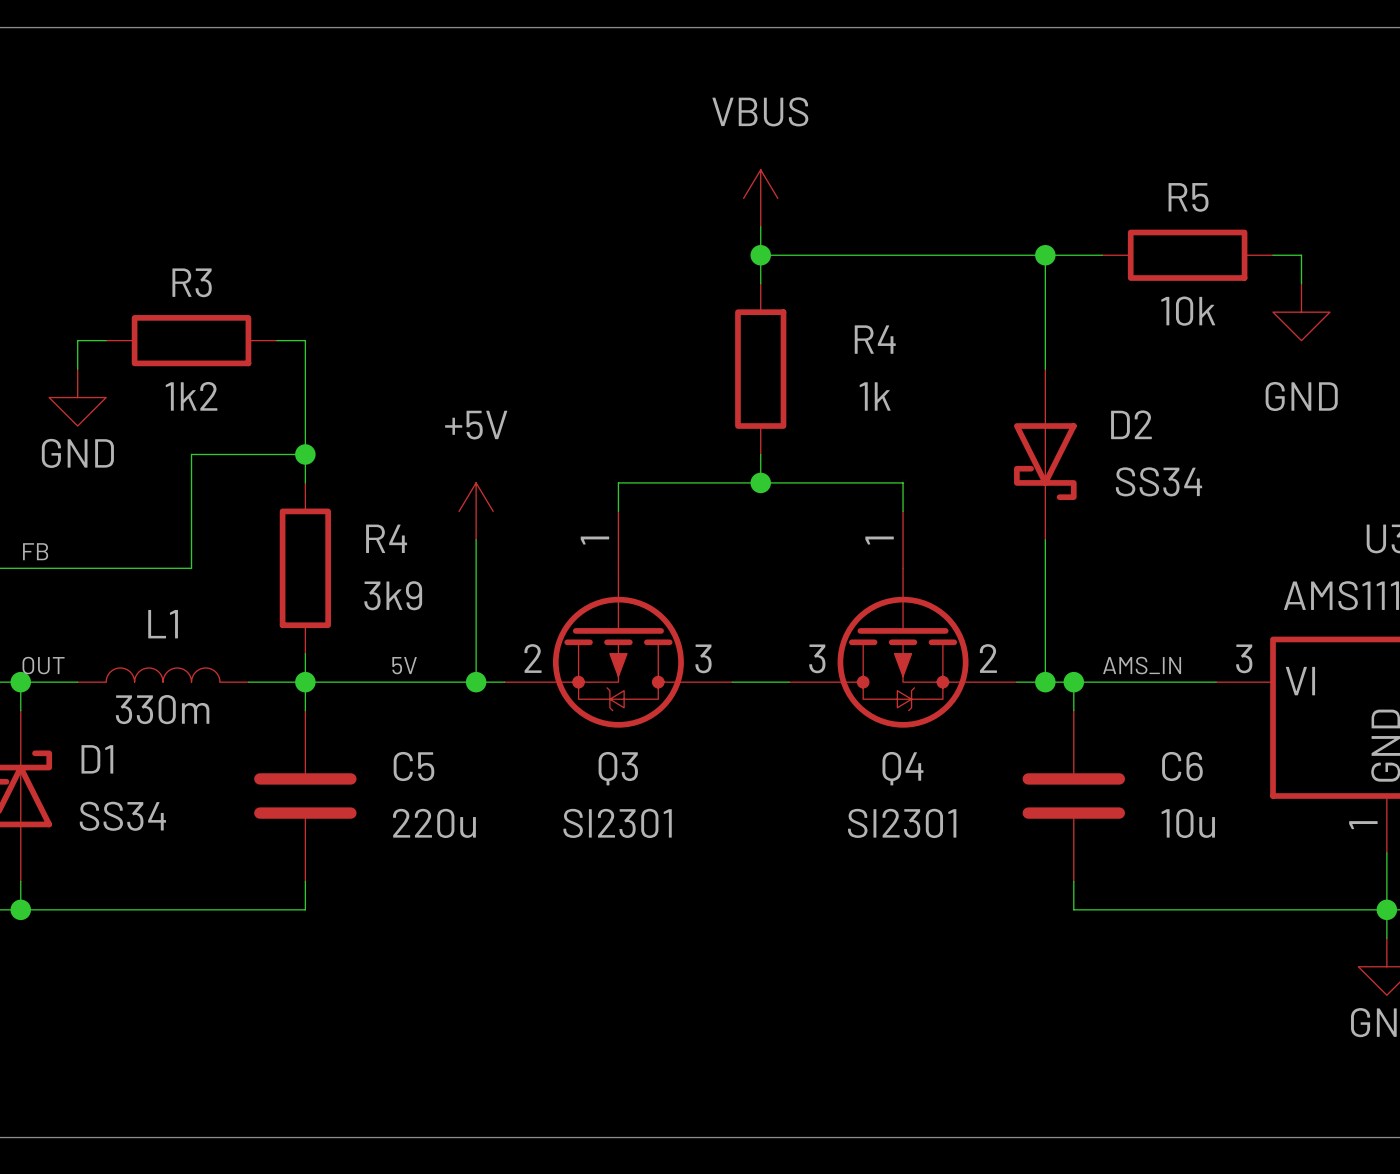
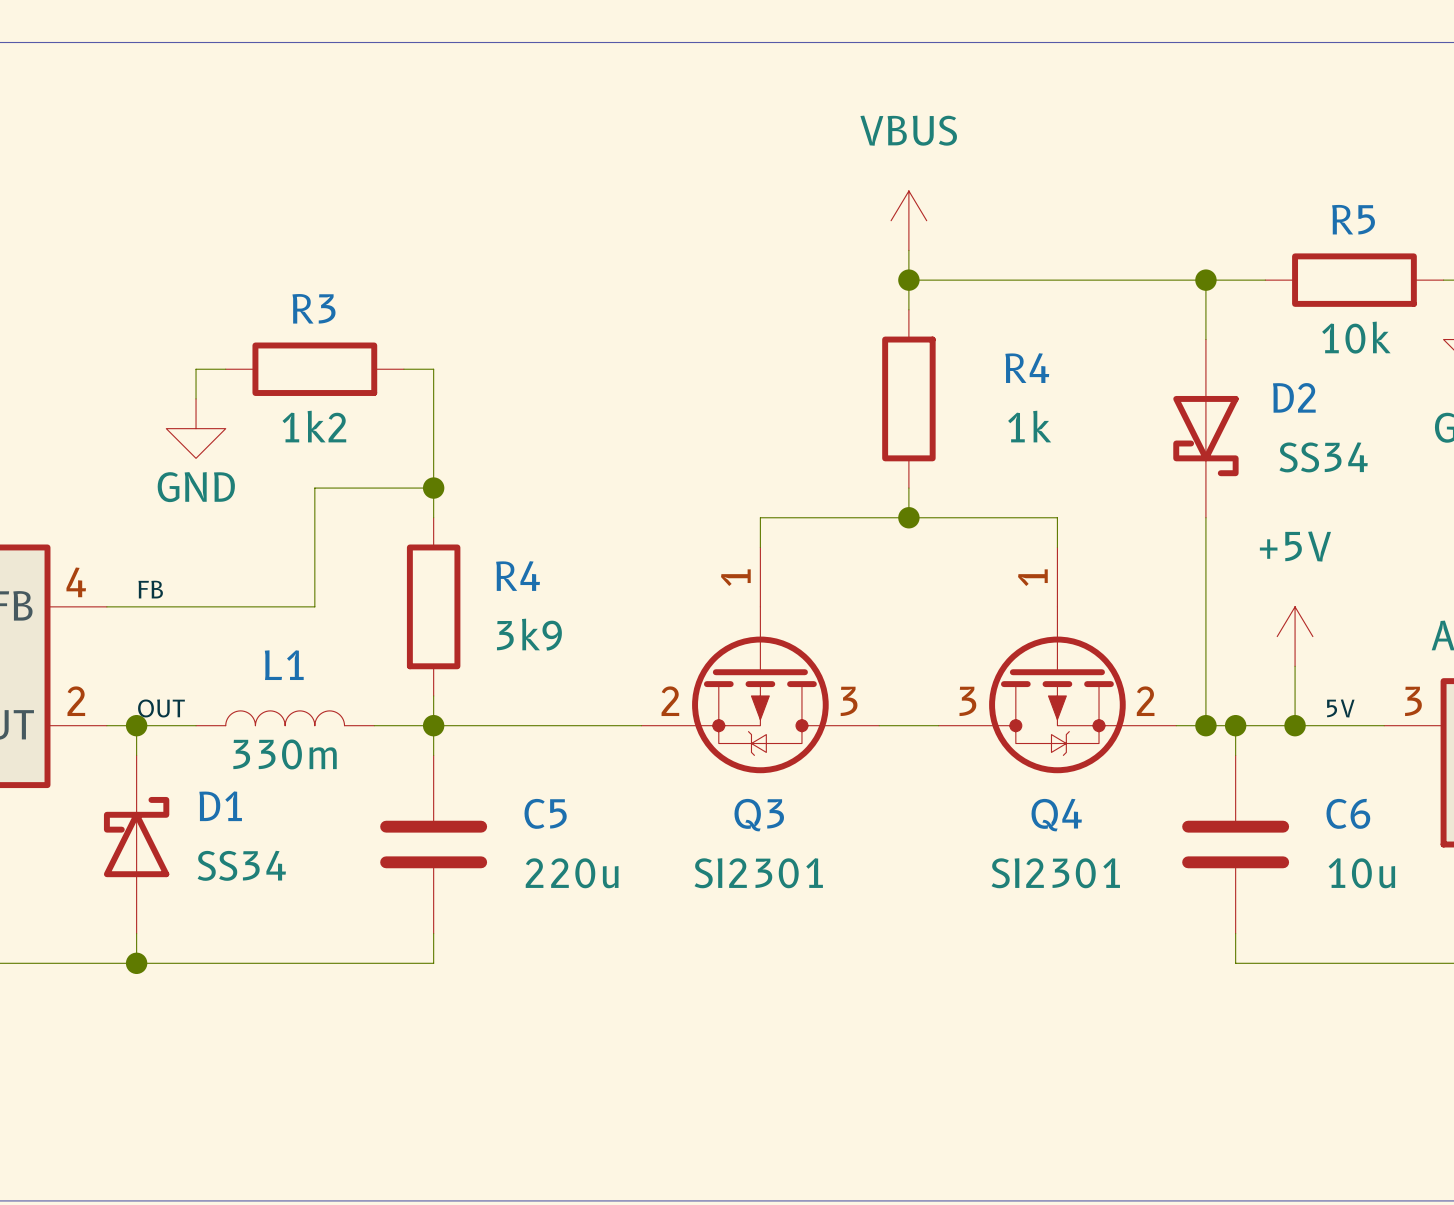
D2 position: (1045, 454) -> (1205, 428)
power symbol: +5V (476, 511) -> none
wire: (476, 539) (476, 682) -> none
power symbol: none -> +5V (1295, 636)
wire: none -> (1295, 666) (1295, 725)
label: 5V (404, 665) -> none
label: AMS_IN (1142, 665) -> none
label: none -> 5V (1340, 708)
junction: (476, 682) -> none
junction: none -> (1295, 725)

